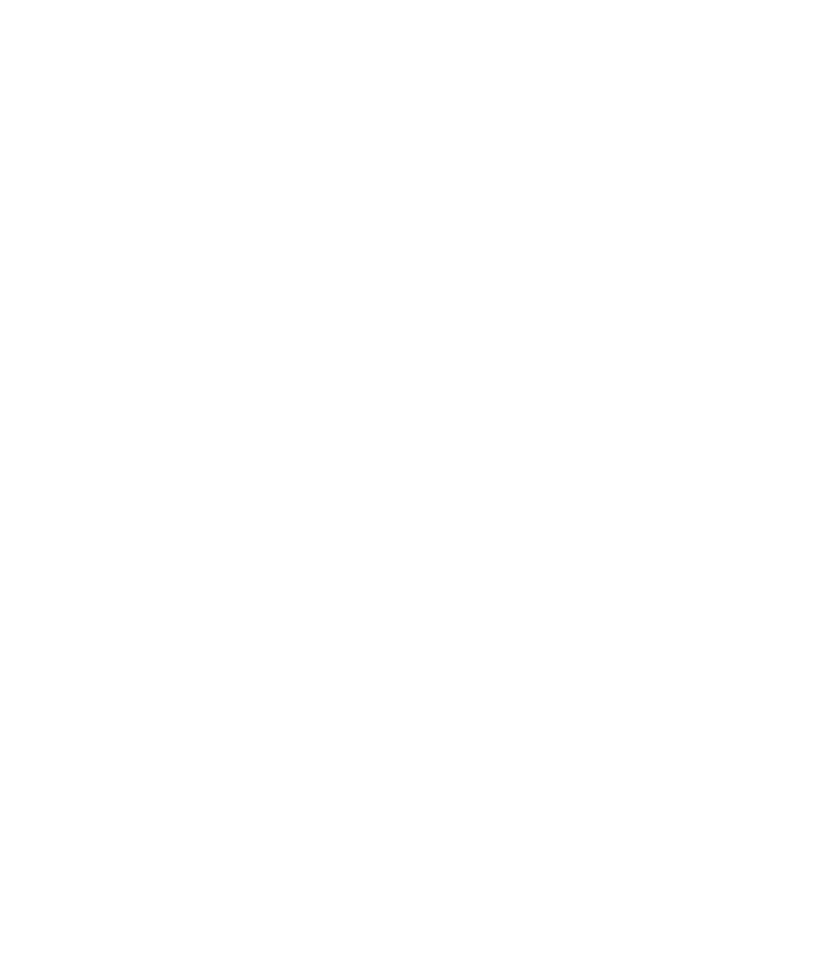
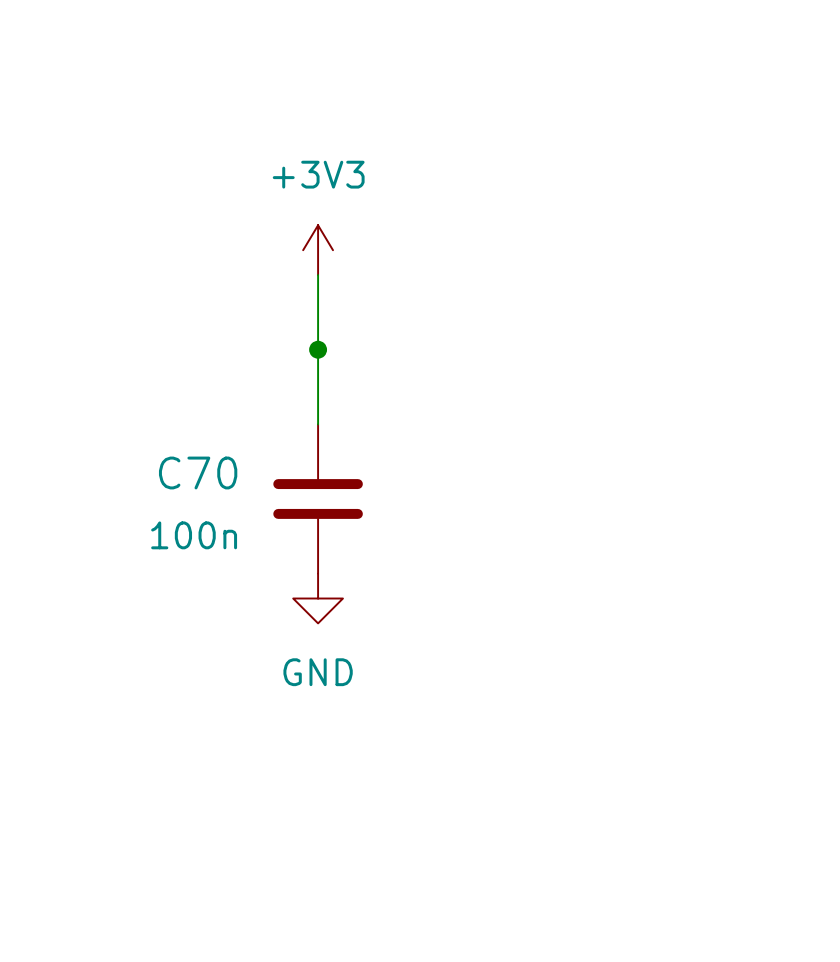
power symbol: none -> +3V3 (318, 250)
wire: none -> (318, 275) (318, 424)
junction: none -> (318, 349)
C70: none -> (318, 498)
power symbol: none -> GND (318, 598)

